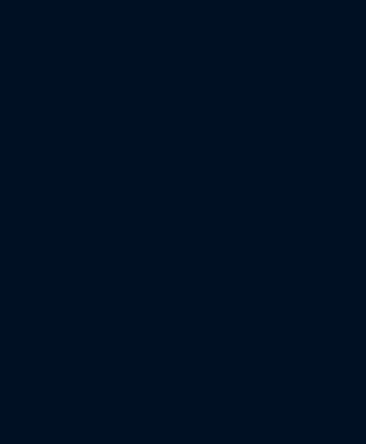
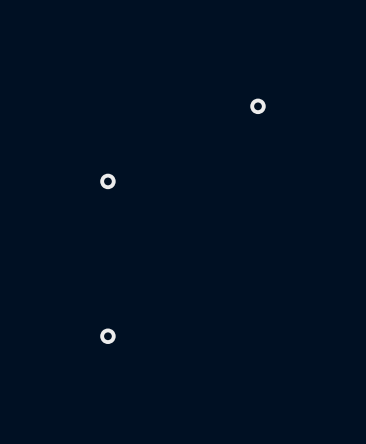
via: none -> (257, 106)
via: none -> (107, 181)
via: none -> (107, 336)

